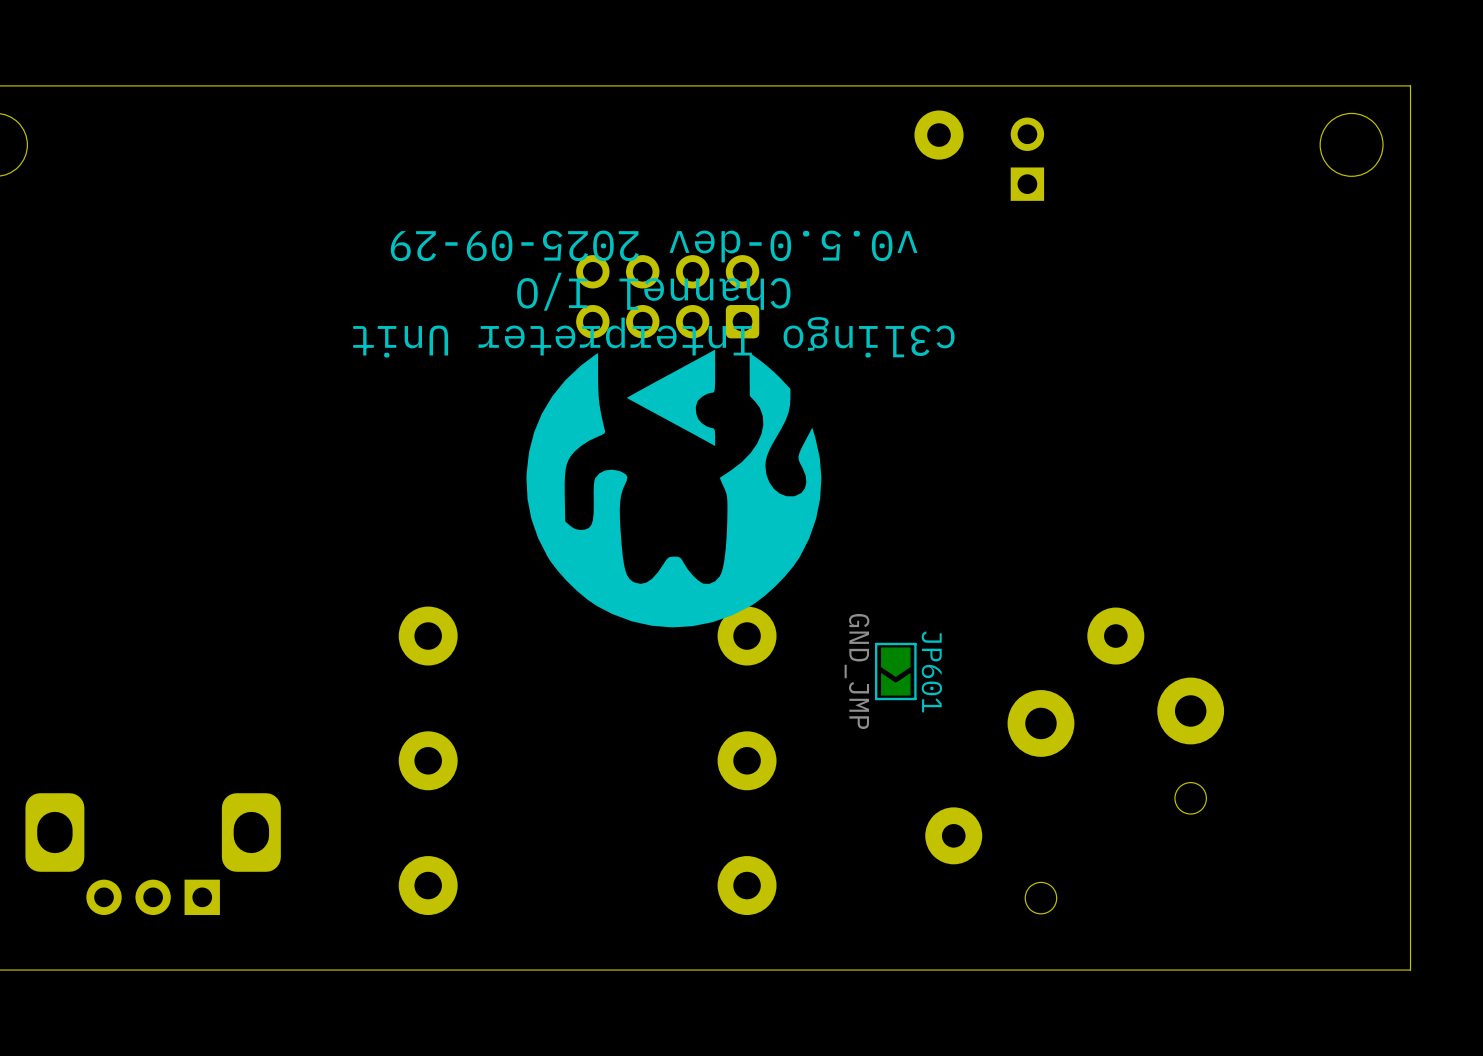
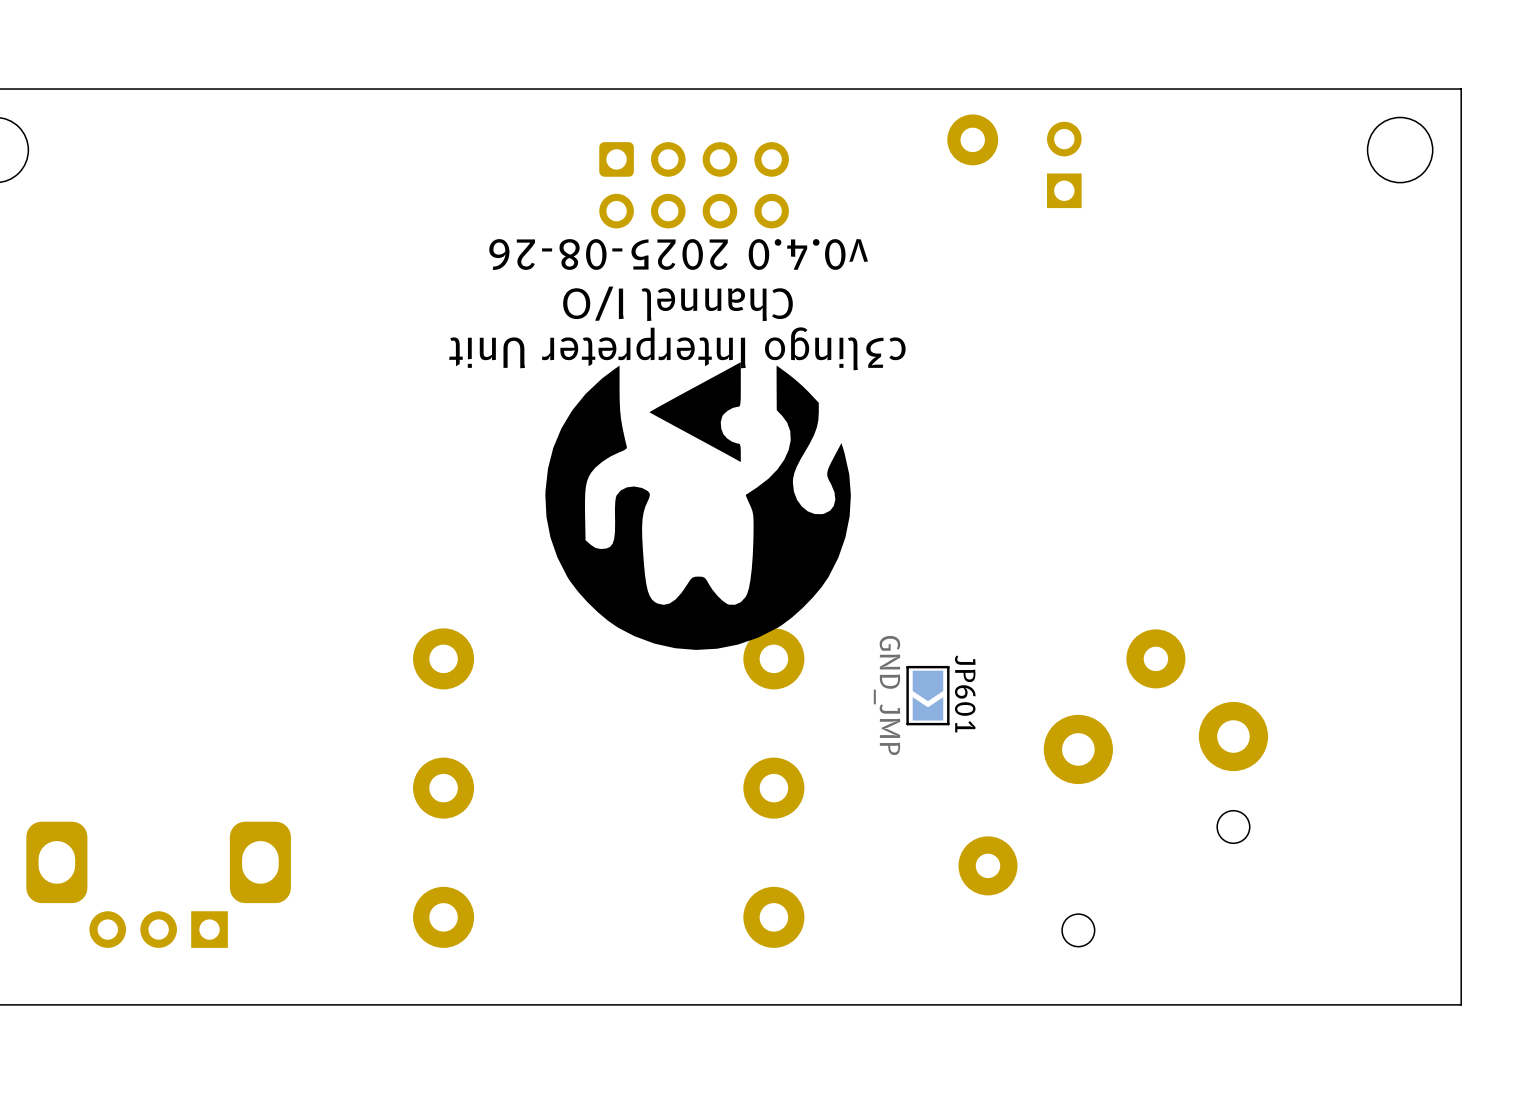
text: v0.5.0-dev 2025-09-29 (654, 246) -> v0.4.0 2025-08-26 (678, 254)
part rotation: 0° (667, 296) -> 180° (694, 185)
part position: (667, 296) -> (694, 185)

